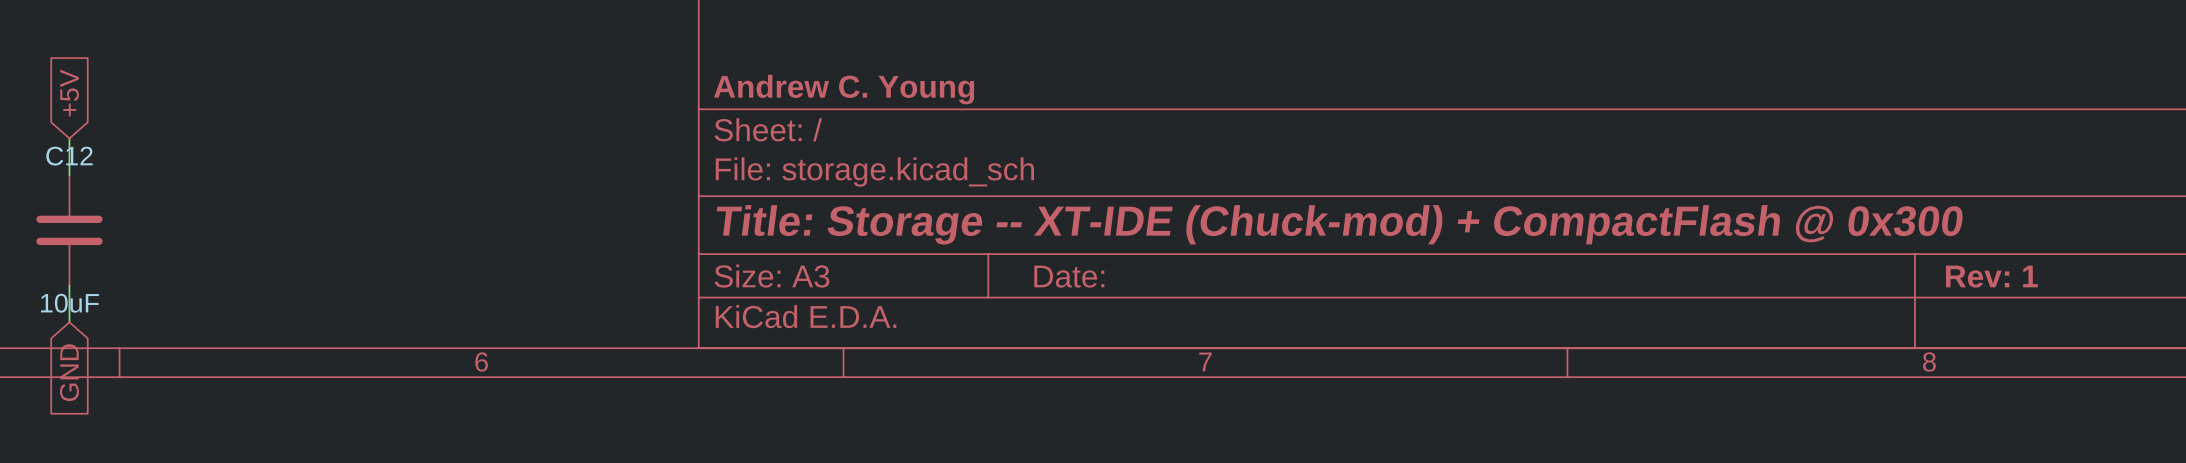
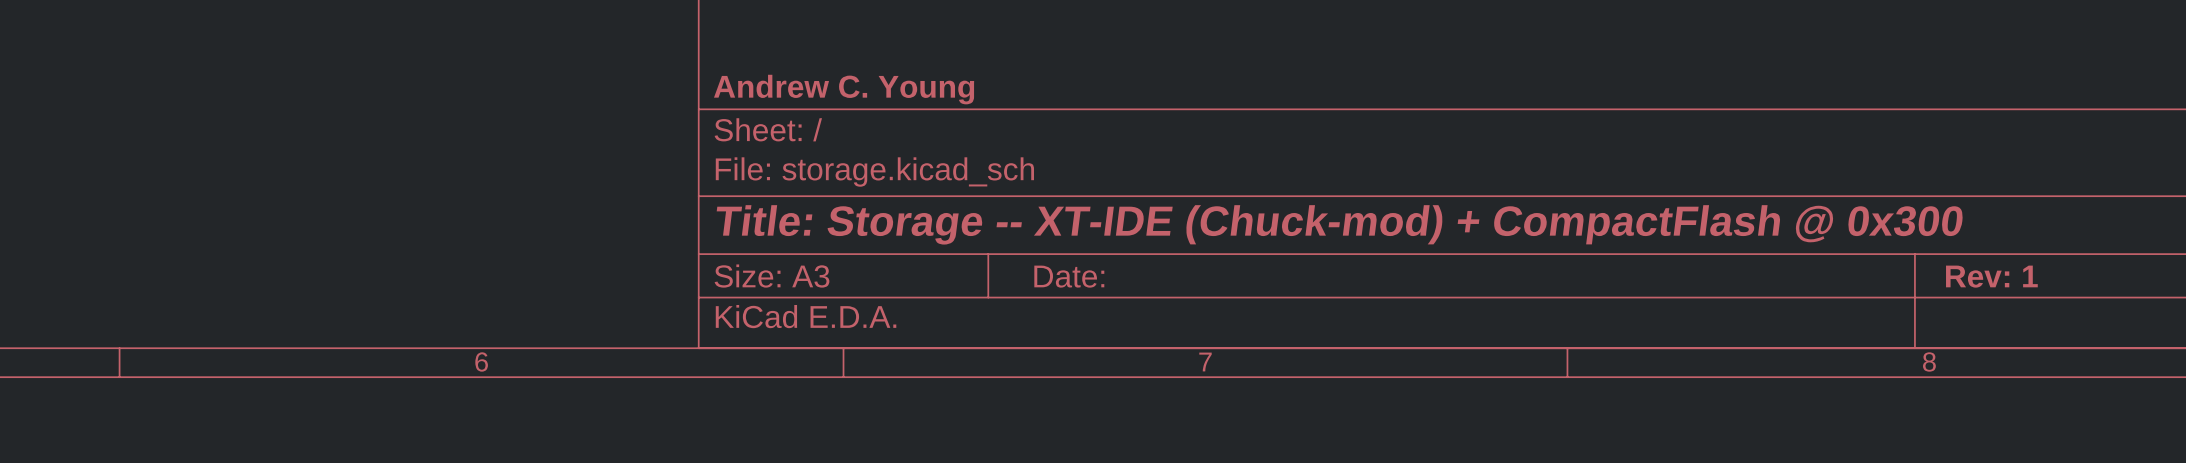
global label: +5V (69, 92) -> none
wire: (69, 138) (69, 175) -> none
C12: 10uF (69, 230) -> none
wire: (69, 285) (69, 322) -> none
global label: GND (69, 372) -> none

